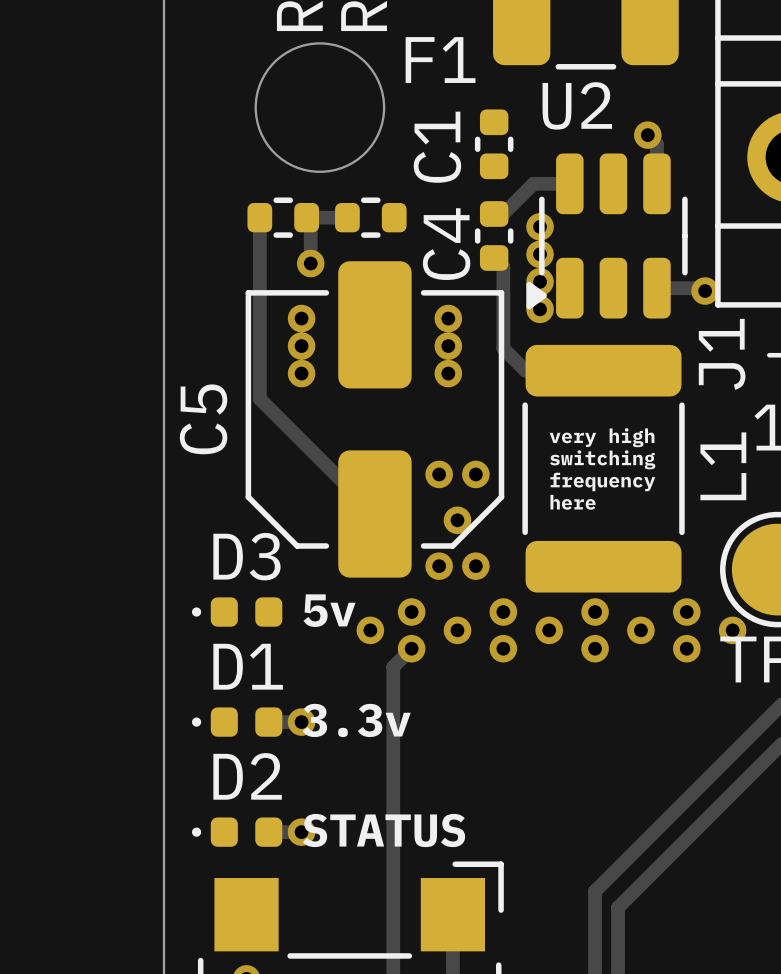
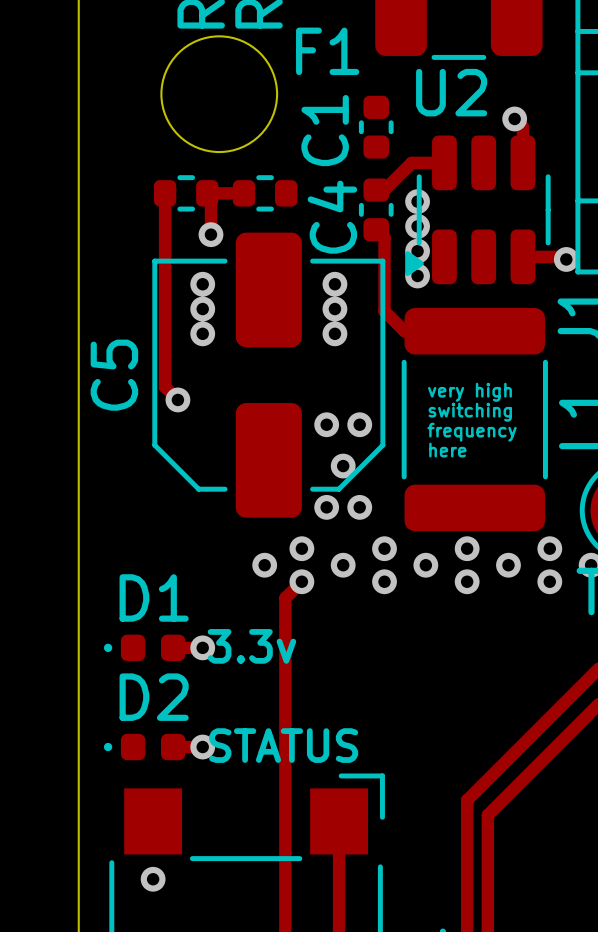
track: (259, 398) (374, 514) -> (165, 356) (165, 387) (177, 399)
via: none -> (177, 399)
text: 5v (329, 610) -> none
D3: (237, 612) -> none

